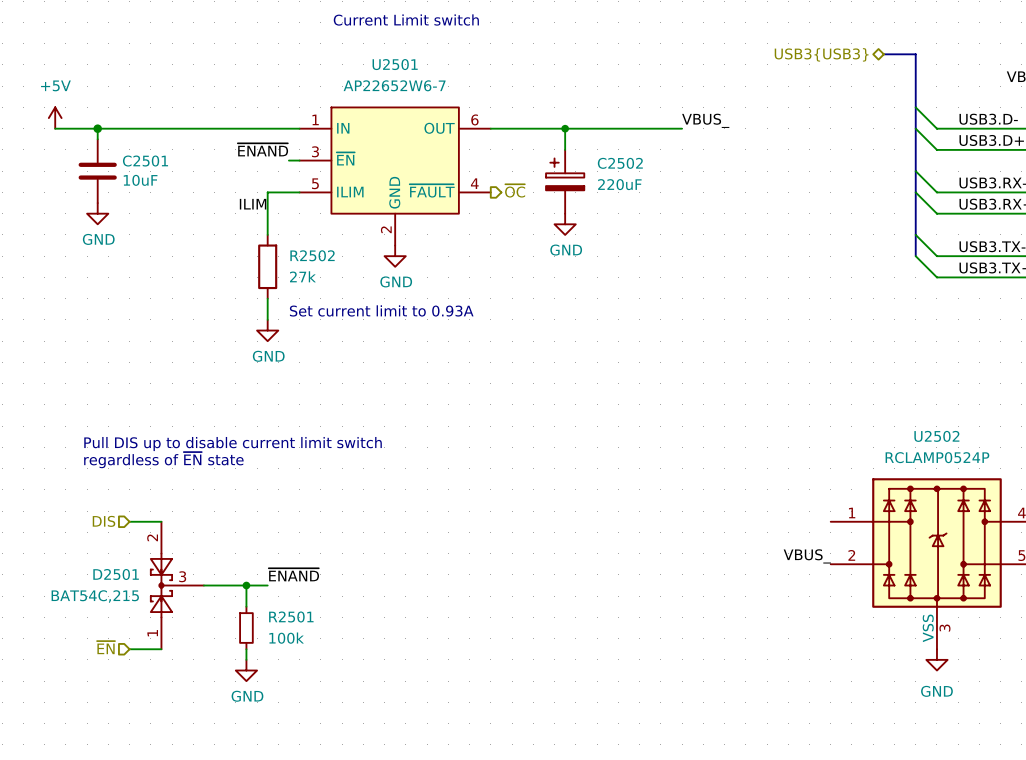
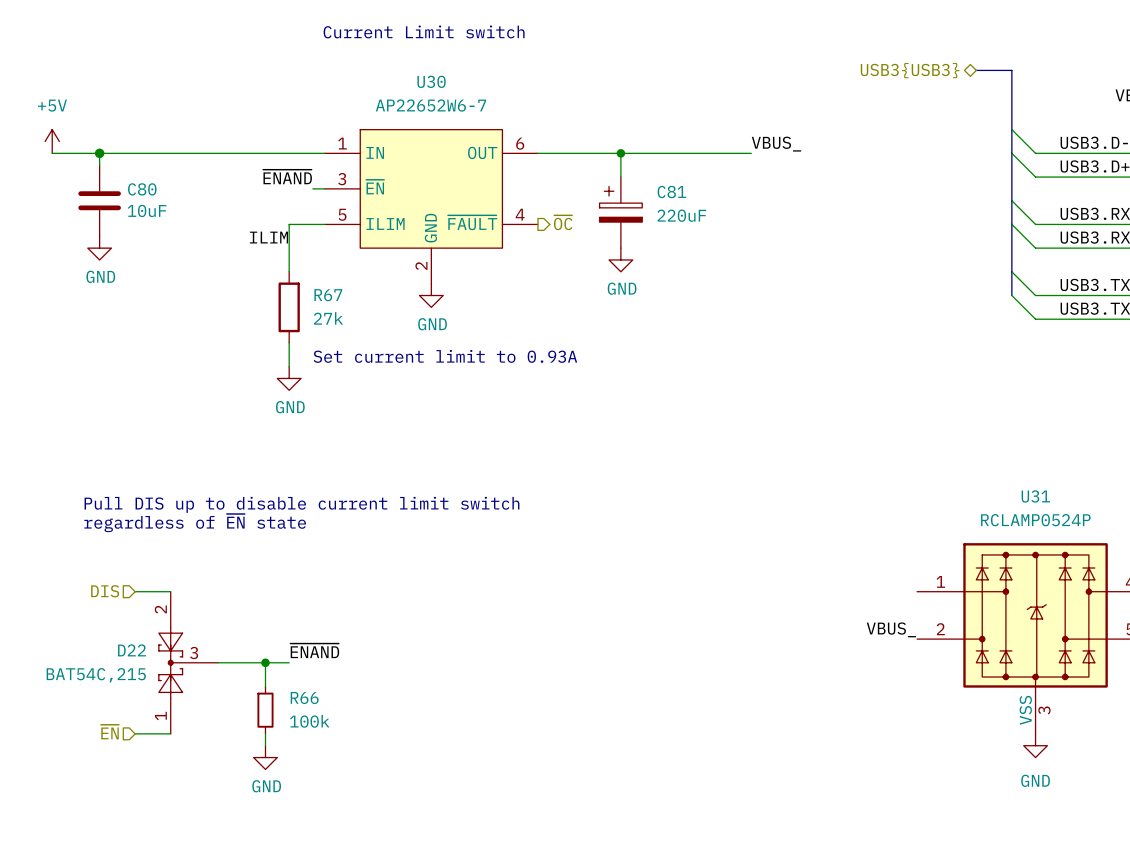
U2501 name: U2501 (395, 64) -> U30 (431, 81)
C2501 name: C2501 (145, 161) -> C80 (142, 189)
C2502 name: C2502 (620, 163) -> C81 (671, 192)
R2502 name: R2502 (312, 255) -> R67 (328, 295)
U2502 name: U2502 (936, 436) -> U31 (1035, 496)
D2501 name: D2501 (116, 574) -> D22 (132, 650)
R2501 name: R2501 (291, 616) -> R66 (304, 697)

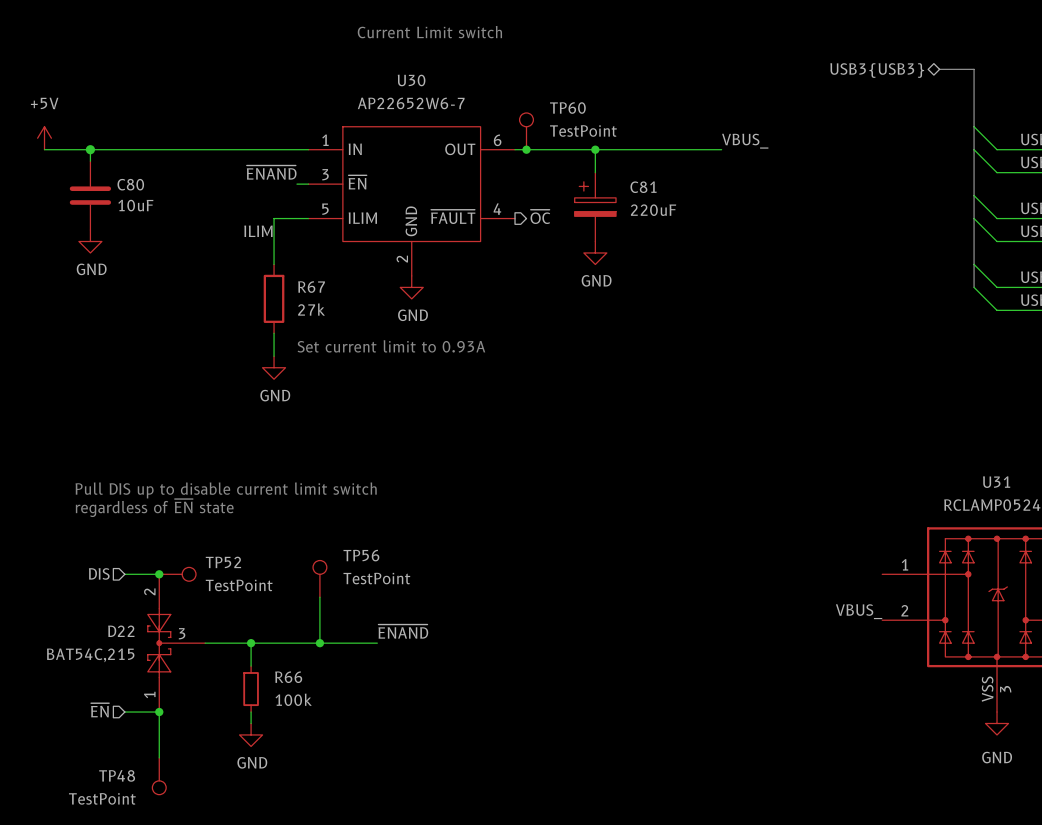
TP60: none -> TestPoint (526, 131)
junction: none -> (526, 149)
junction: none -> (159, 574)
TP52: none -> TestPoint (177, 574)
TP56: none -> TestPoint (319, 578)
wire: none -> (319, 597) (319, 643)
label position: ~{ENAND} (314, 650) -> ~{ENAND} (403, 631)
wire: none -> (274, 643) (377, 643)
junction: none -> (319, 643)
wire: none -> (159, 712) (159, 757)
junction: none -> (159, 712)
TP48: none -> TestPoint (159, 776)

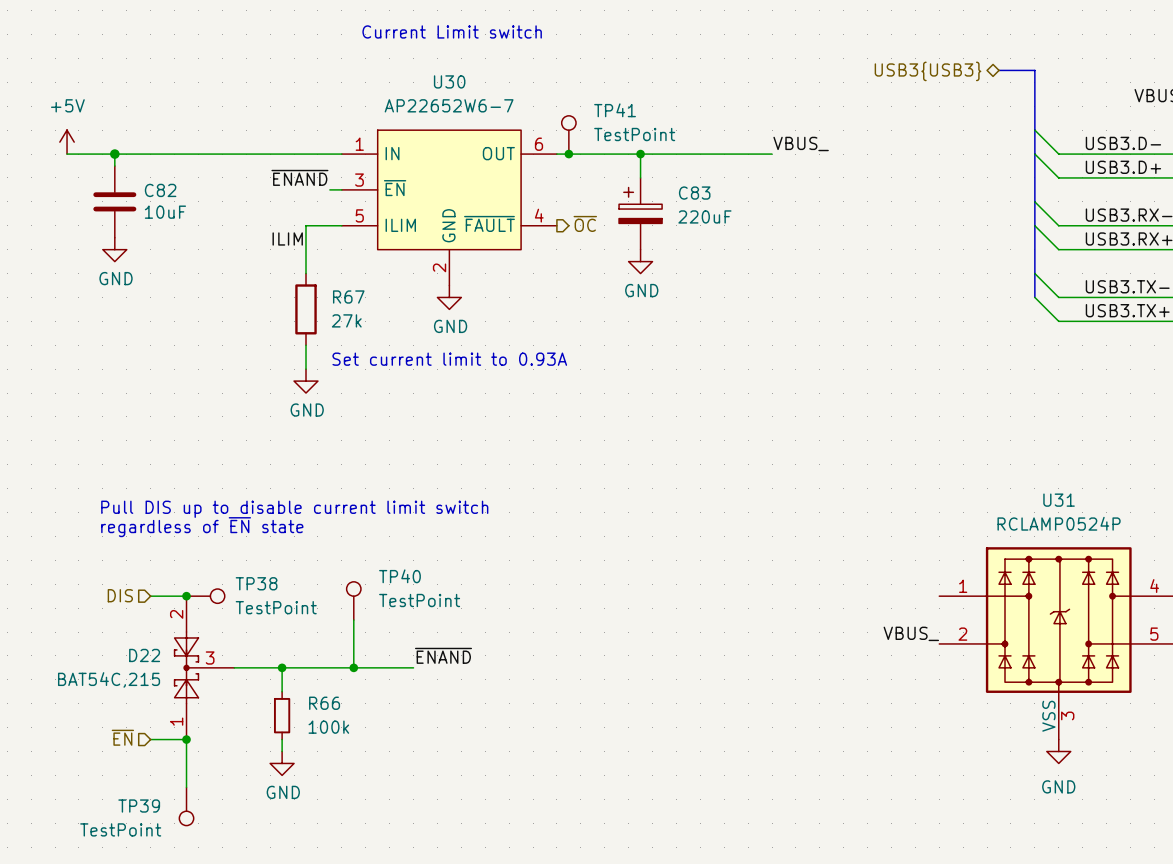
TP60 name: TP60 (567, 108) -> TP41 (615, 110)
C80 name: C80 (130, 184) -> C82 (160, 190)
C81 name: C81 (643, 187) -> C83 (694, 193)
TP56 name: TP56 (361, 555) -> TP40 (399, 576)
TP52 name: TP52 (223, 562) -> TP38 (256, 583)
TP48 name: TP48 (117, 775) -> TP39 (139, 806)

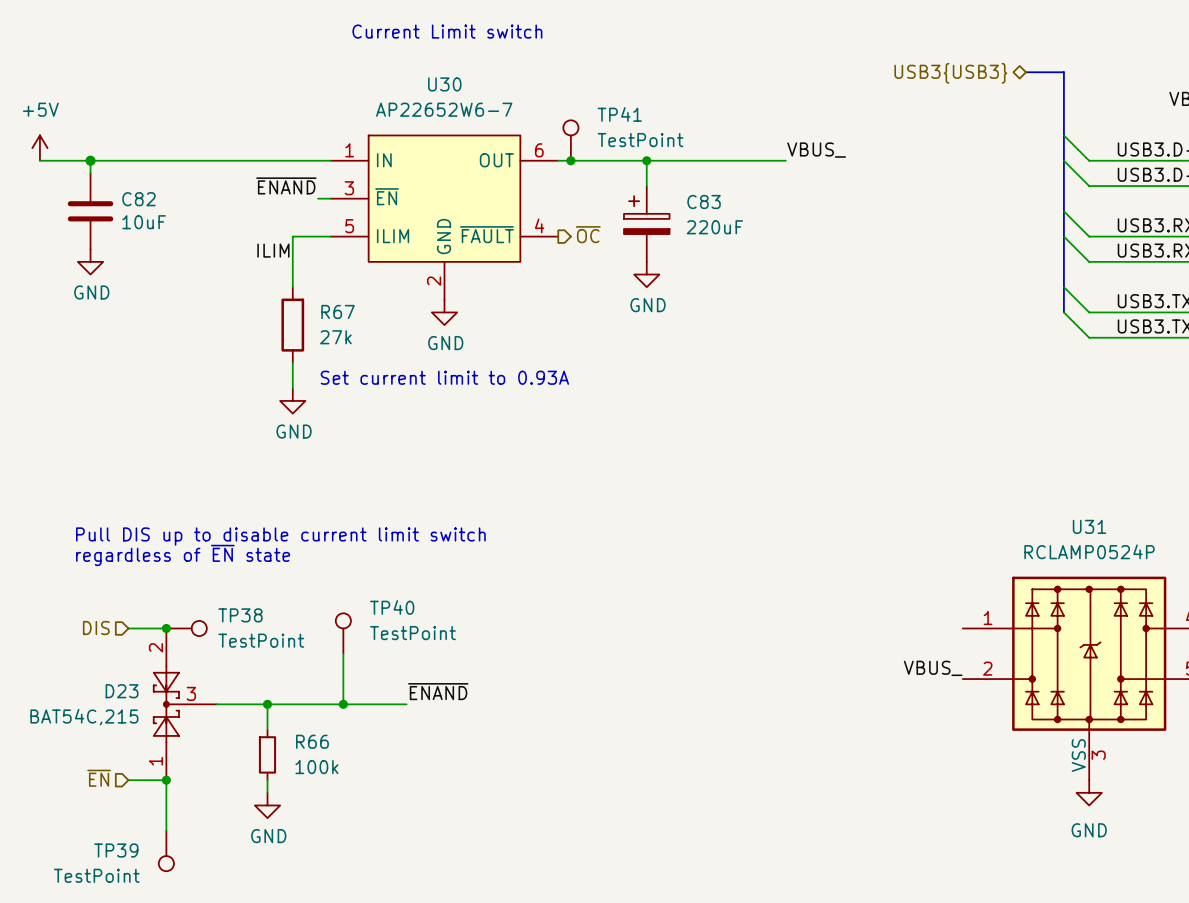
D22 name: D22 (144, 655) -> D23 (122, 691)

